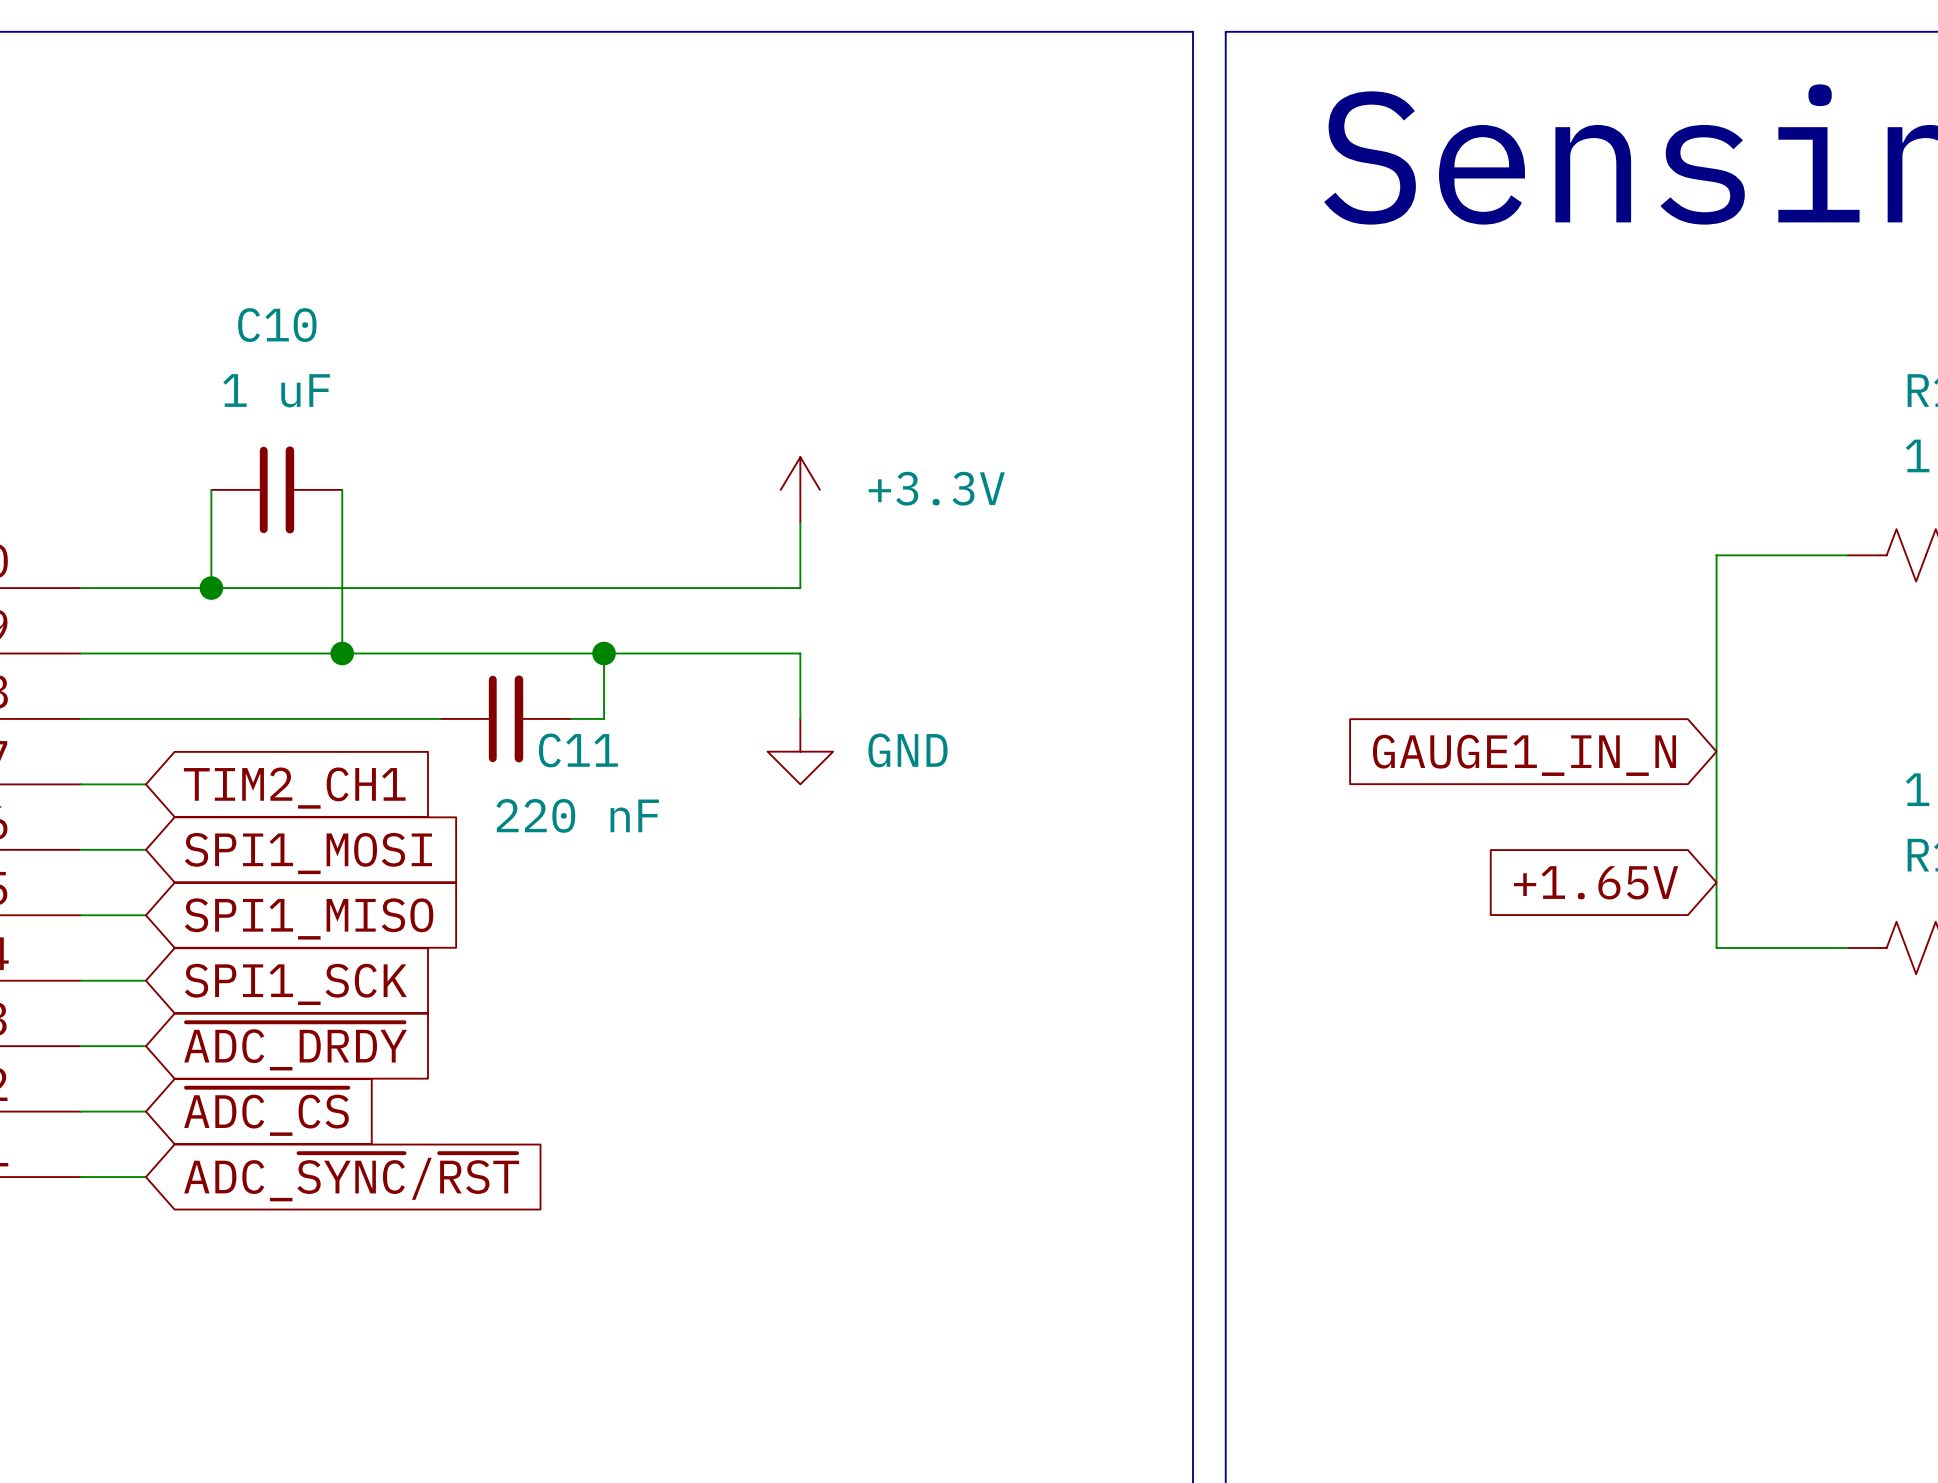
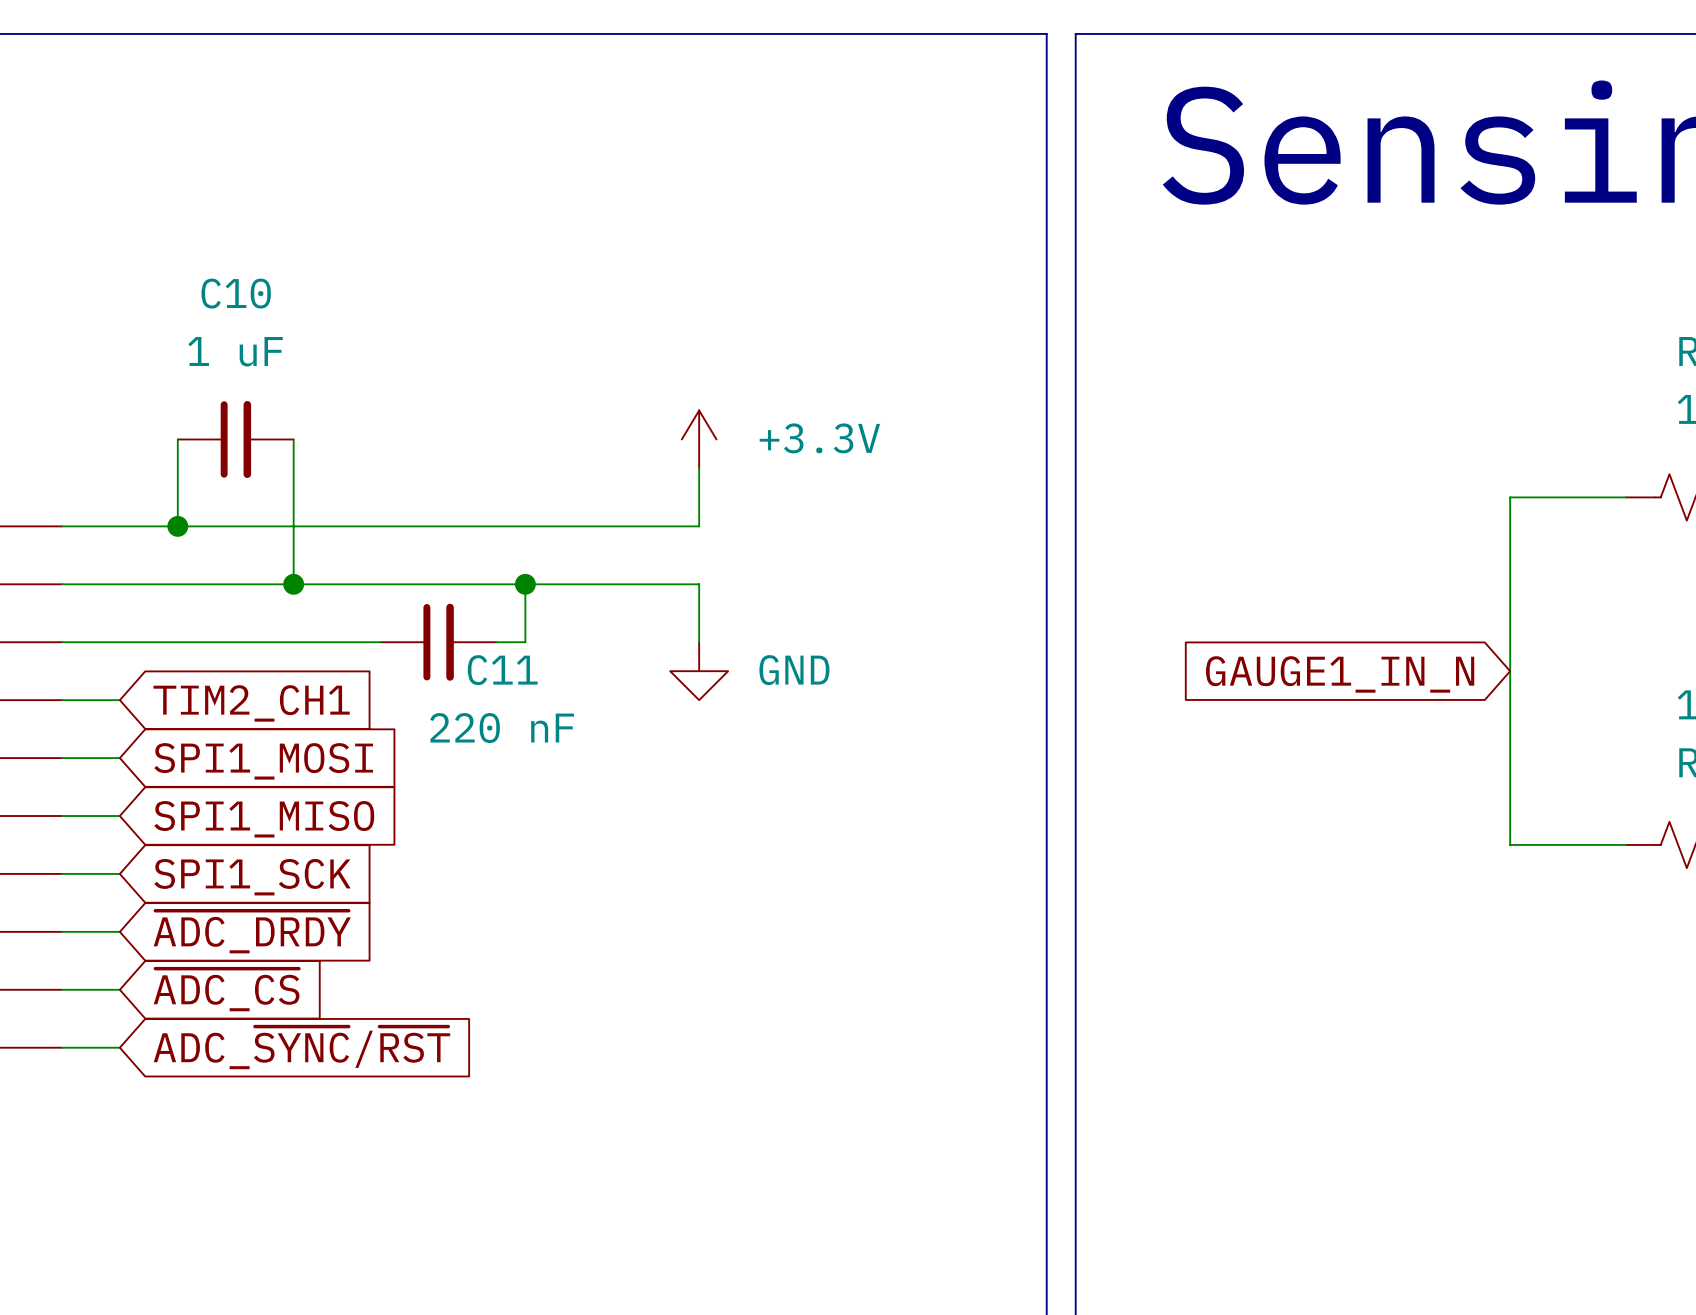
global label: +1.65V (1595, 882) -> none

